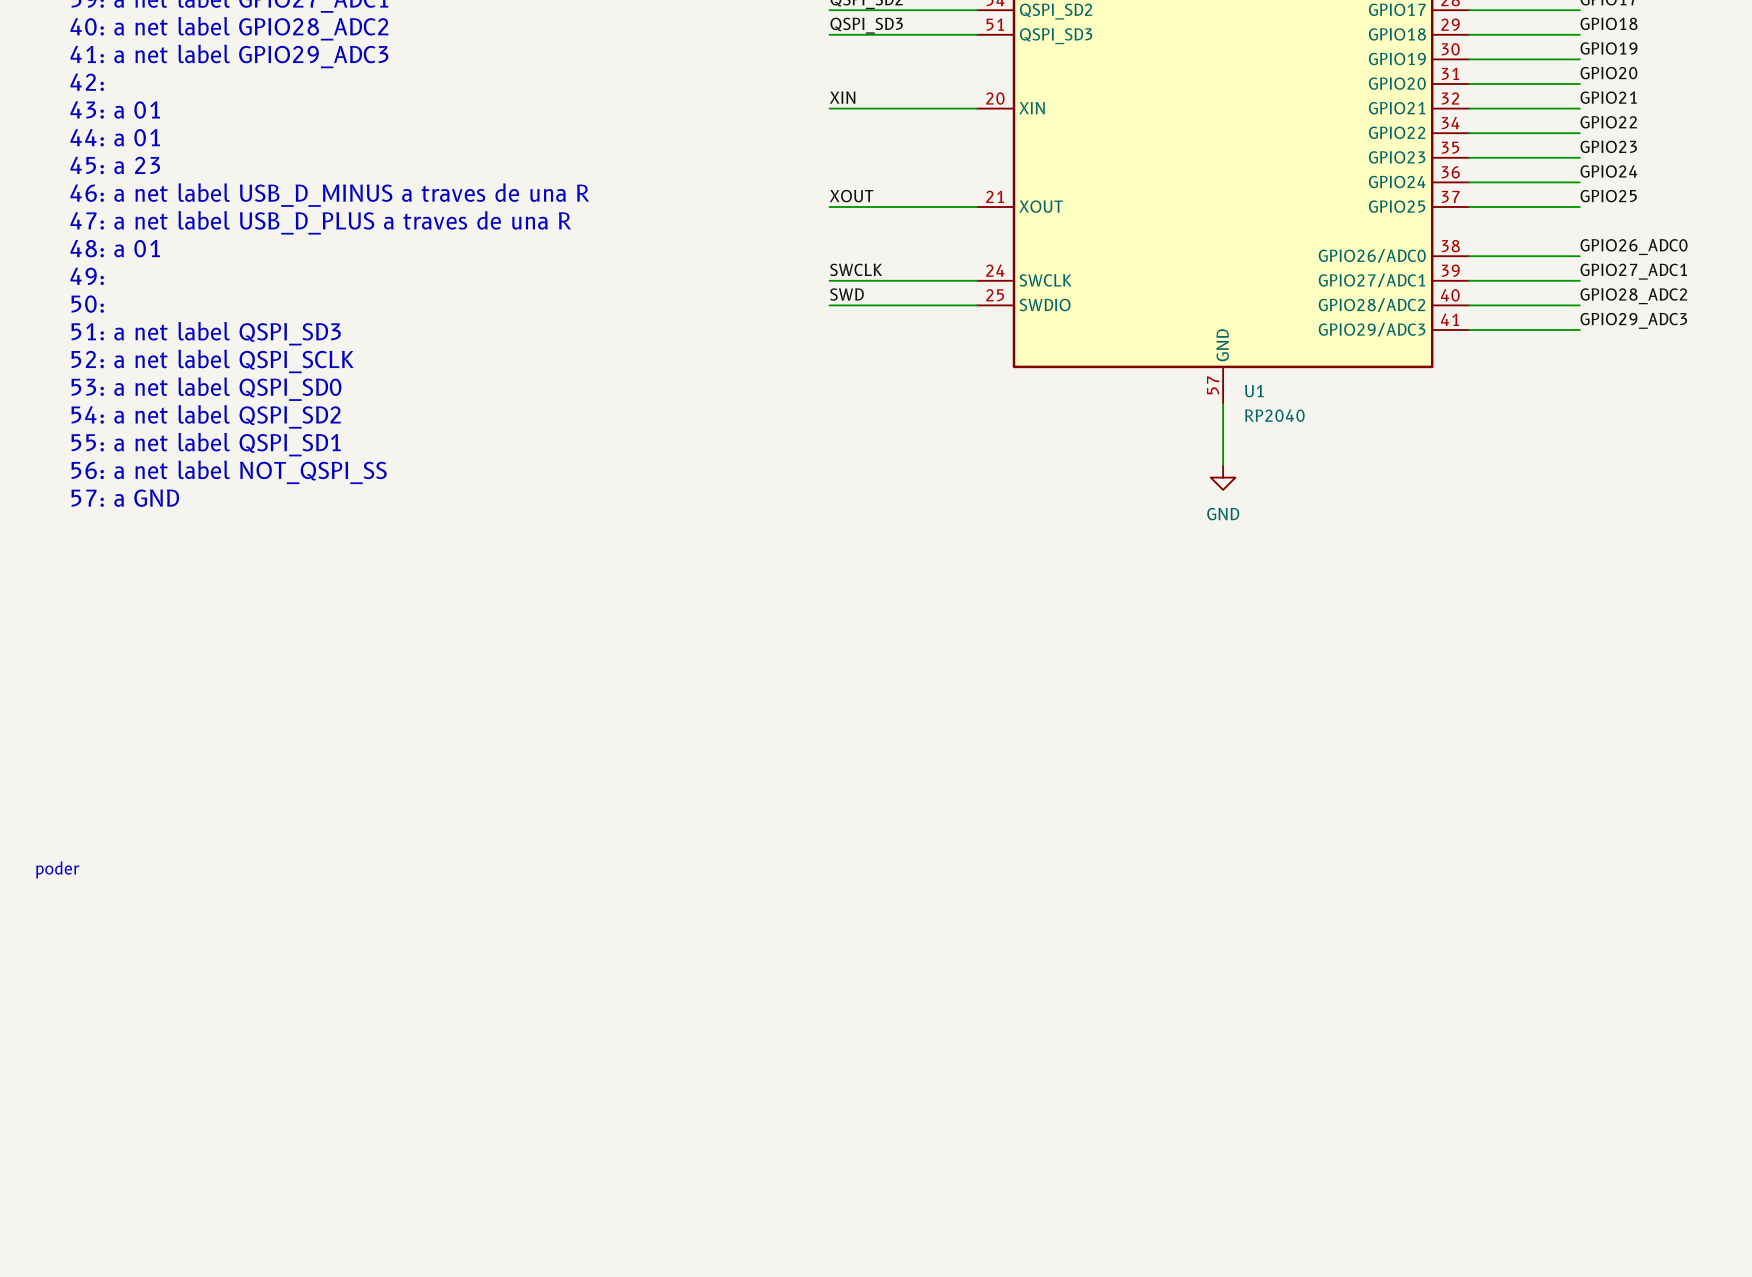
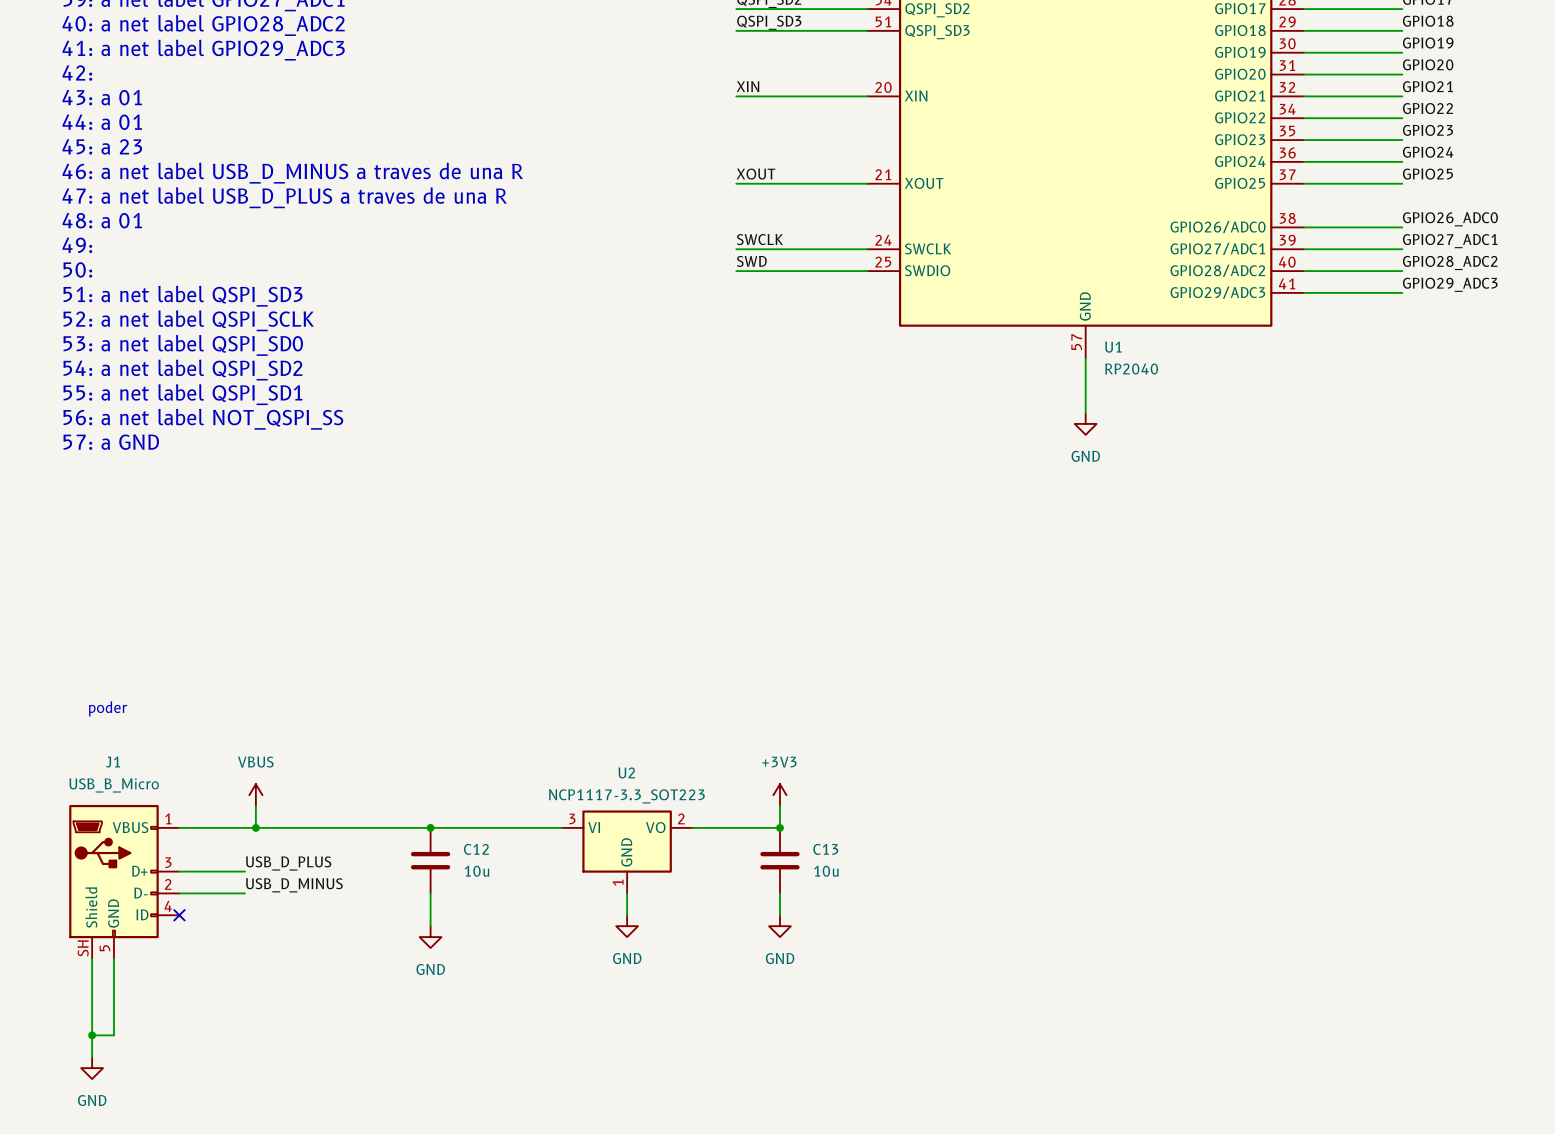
text position: poder (57, 869) -> poder (108, 708)
power symbol: none -> VBUS (255, 795)
power symbol: none -> +3V3 (779, 795)
wire: none -> (255, 806) (255, 827)
wire: none -> (779, 806) (779, 827) (692, 827)
wire: none -> (179, 827) (561, 827)
junction: none -> (255, 827)
junction: none -> (430, 827)
junction: none -> (779, 827)
U2: none -> NCP1117-3.3_SOT223 (627, 851)
C12: none -> 10u (430, 860)
C13: none -> 10u (779, 860)
label: none -> USB_D_PLUS (288, 863)
wire: none -> (179, 871) (244, 871)
J1: none -> USB_B_Micro (124, 881)
label: none -> USB_D_MINUS (294, 885)
wire: none -> (179, 893) (244, 893)
wire: none -> (430, 893) (430, 926)
wire: none -> (627, 893) (627, 915)
wire: none -> (779, 893) (779, 915)
no-connect mark: none -> (179, 915)
power symbol: none -> GND (627, 926)
power symbol: none -> GND (779, 926)
power symbol: none -> GND (430, 937)
wire: none -> (92, 958) (92, 1057)
wire: none -> (113, 958) (113, 1035) (92, 1035)
junction: none -> (92, 1035)
power symbol: none -> GND (92, 1068)

